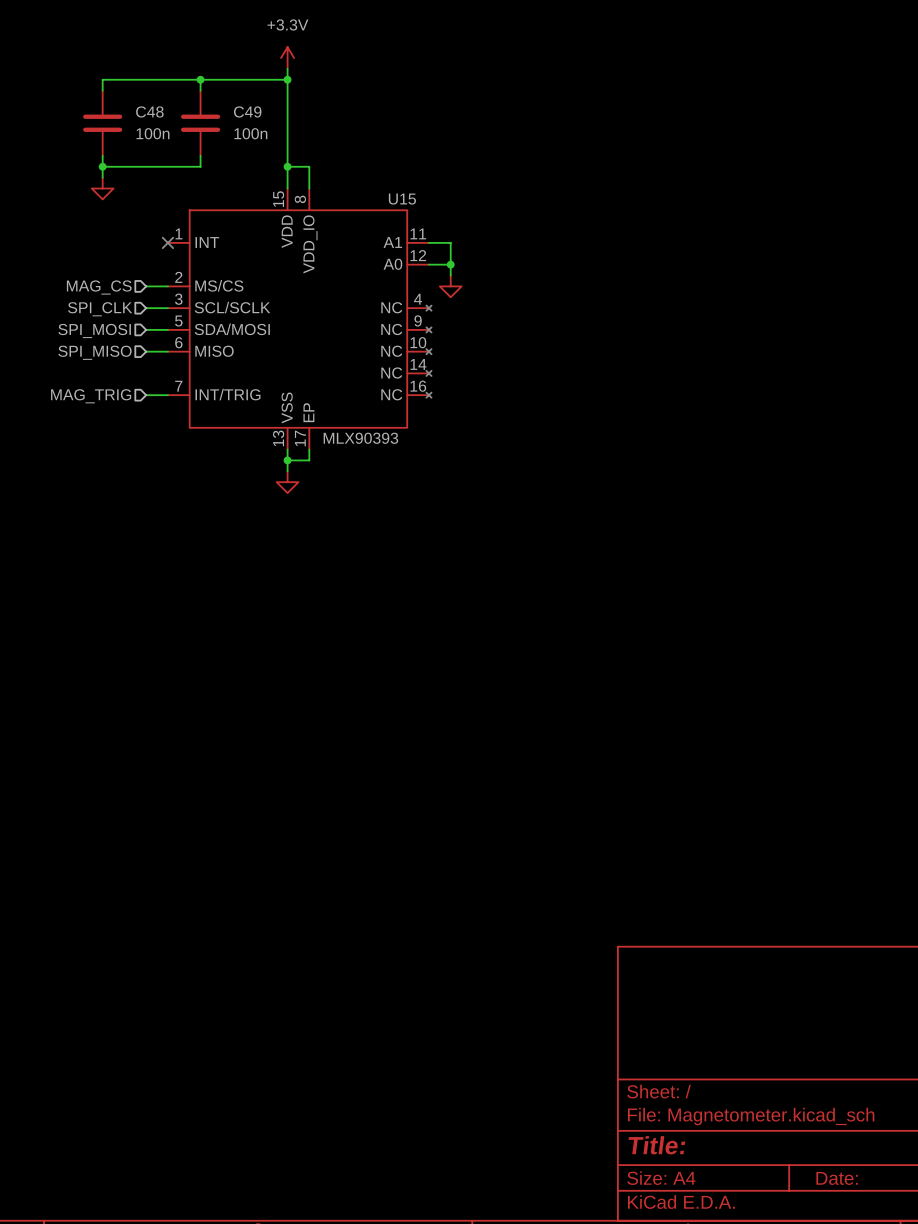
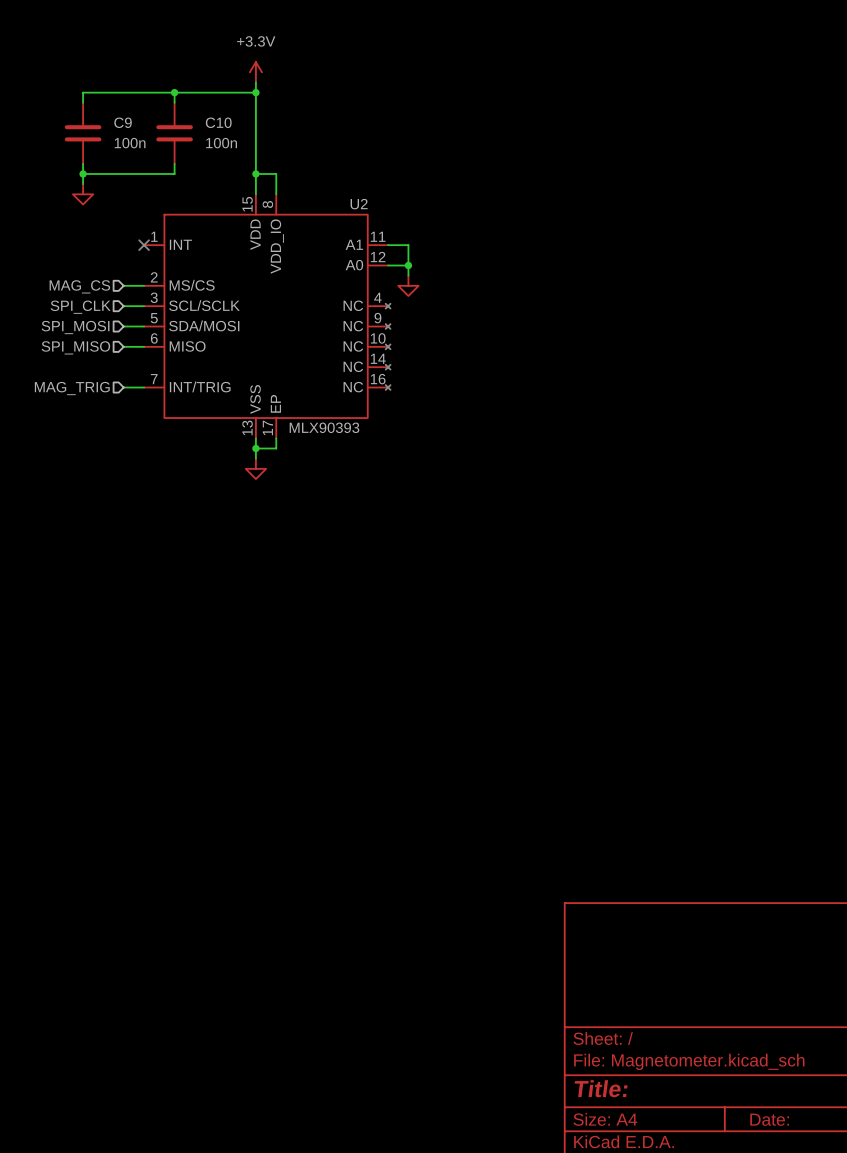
C48 name: C48 (149, 111) -> C9 (123, 122)
C49 name: C49 (247, 111) -> C10 (218, 122)
U15 name: U15 (402, 199) -> U2 (359, 204)

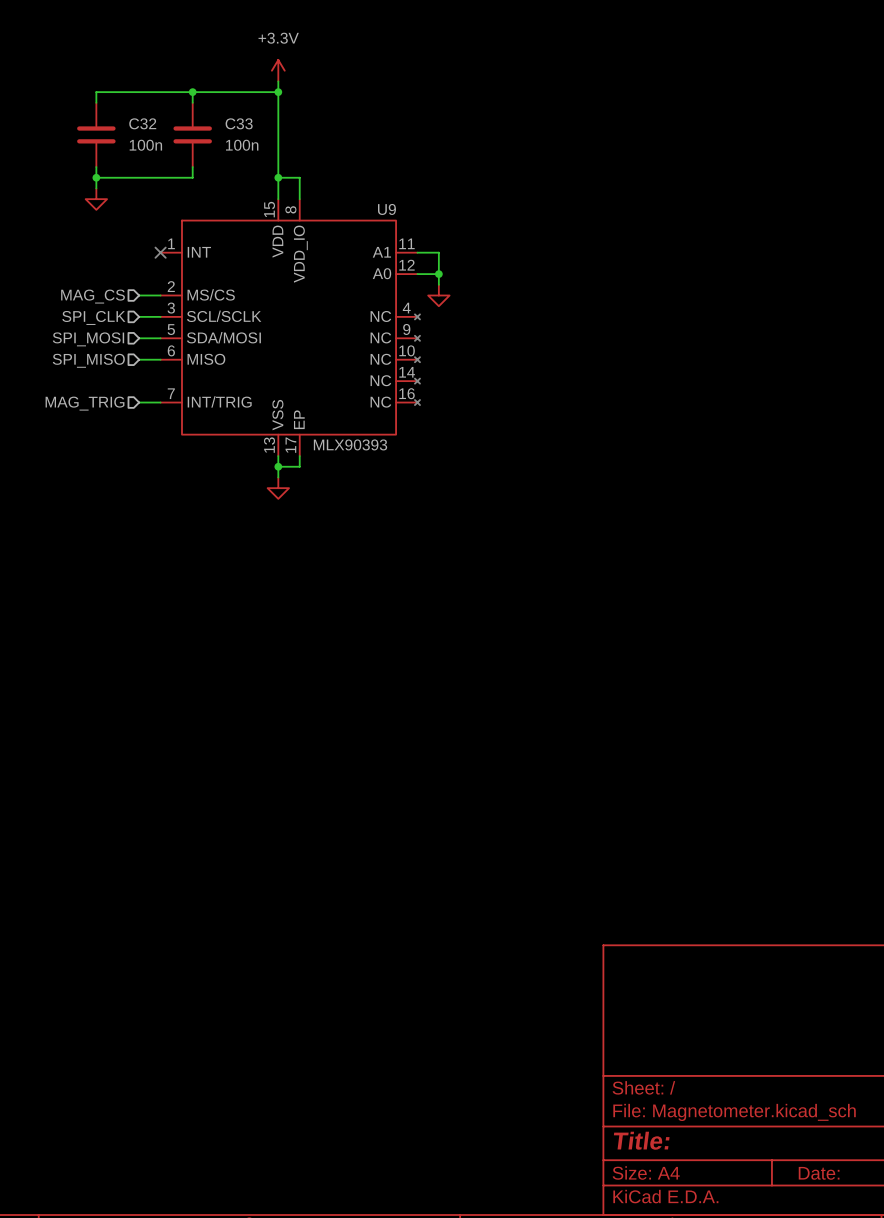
C9 name: C9 (123, 122) -> C32 (142, 123)
C10 name: C10 (218, 122) -> C33 (239, 123)
U2 name: U2 (359, 204) -> U9 (386, 209)

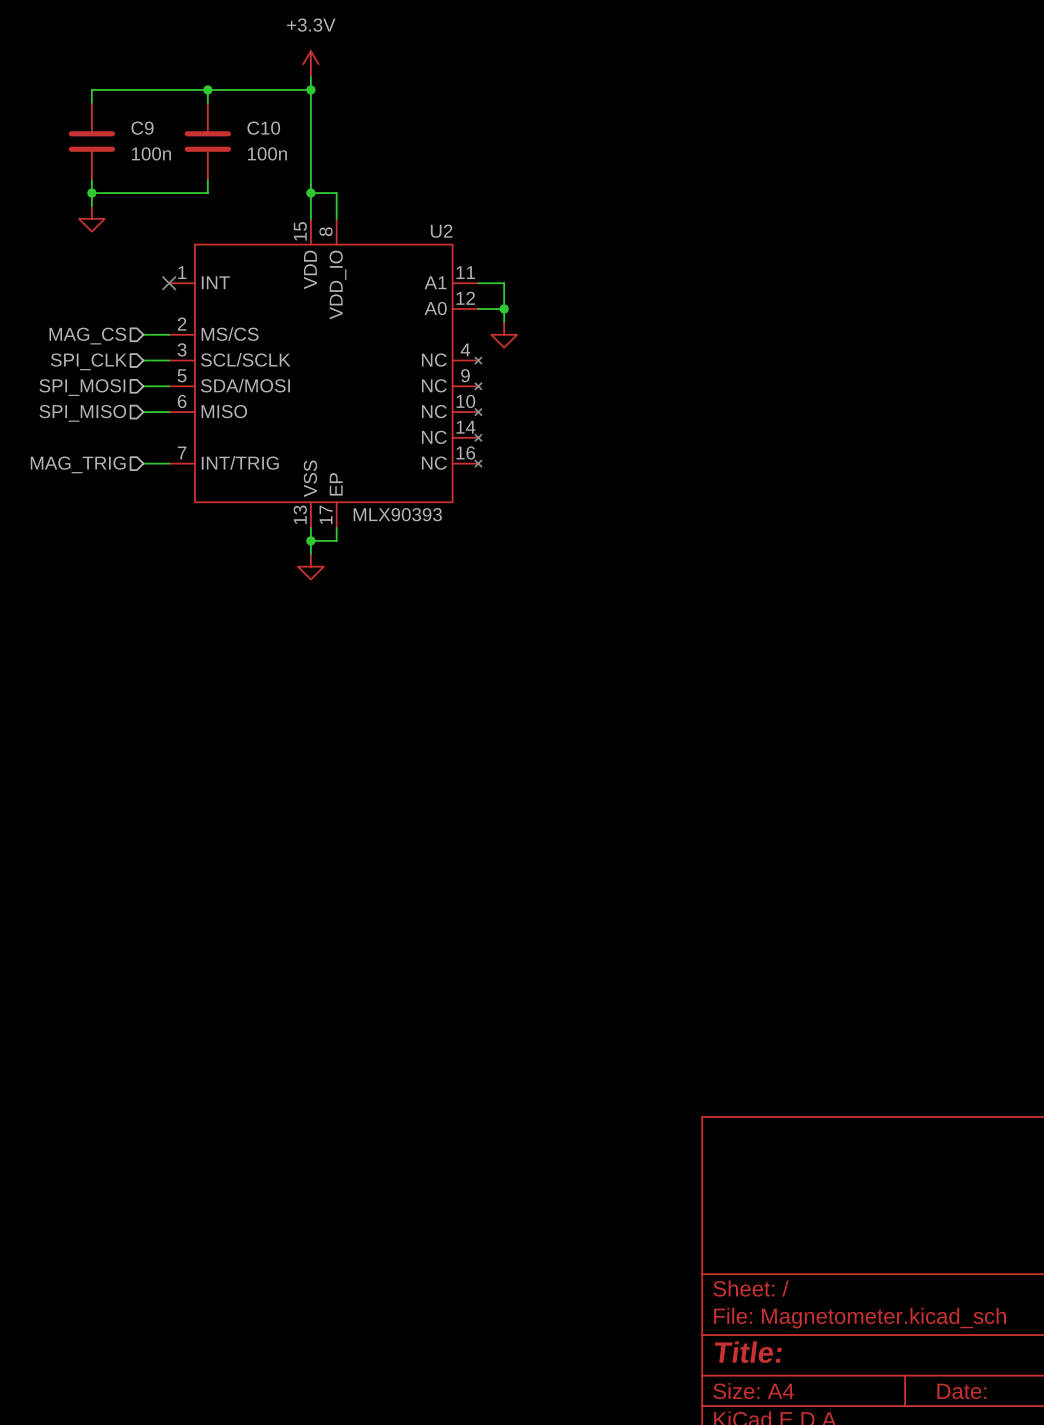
C32 name: C32 (142, 123) -> C9 (142, 128)
C33 name: C33 (239, 123) -> C10 (263, 128)
U9 name: U9 (386, 209) -> U2 (441, 231)

